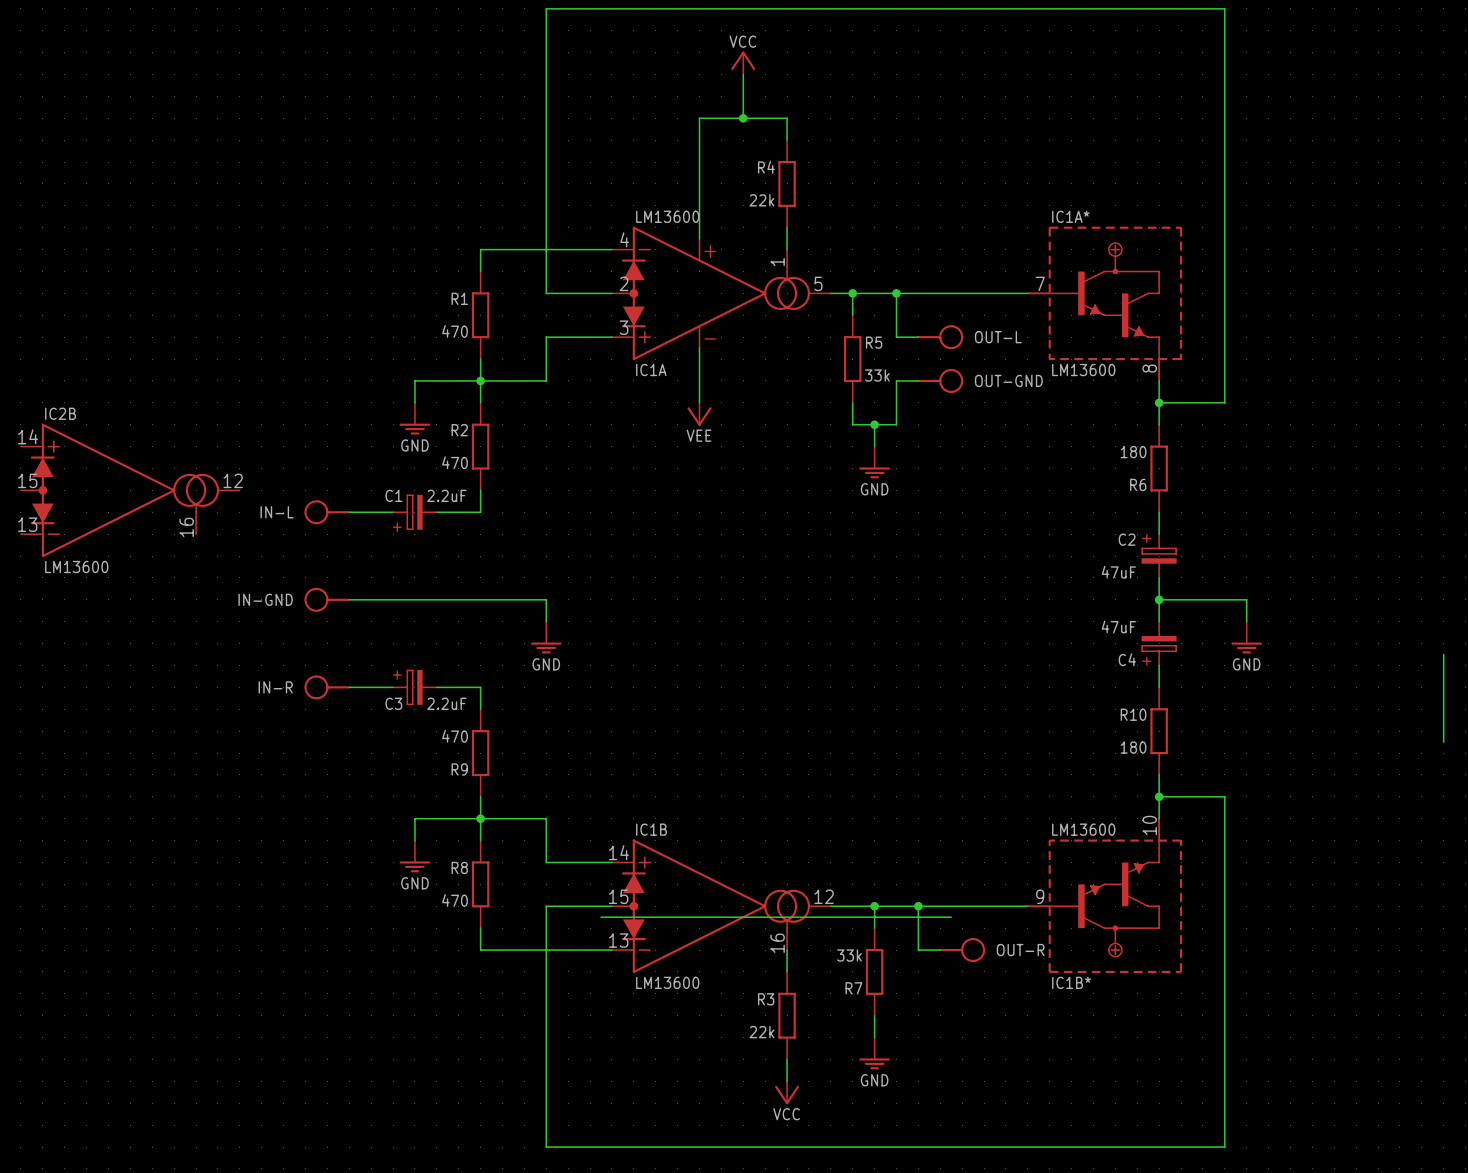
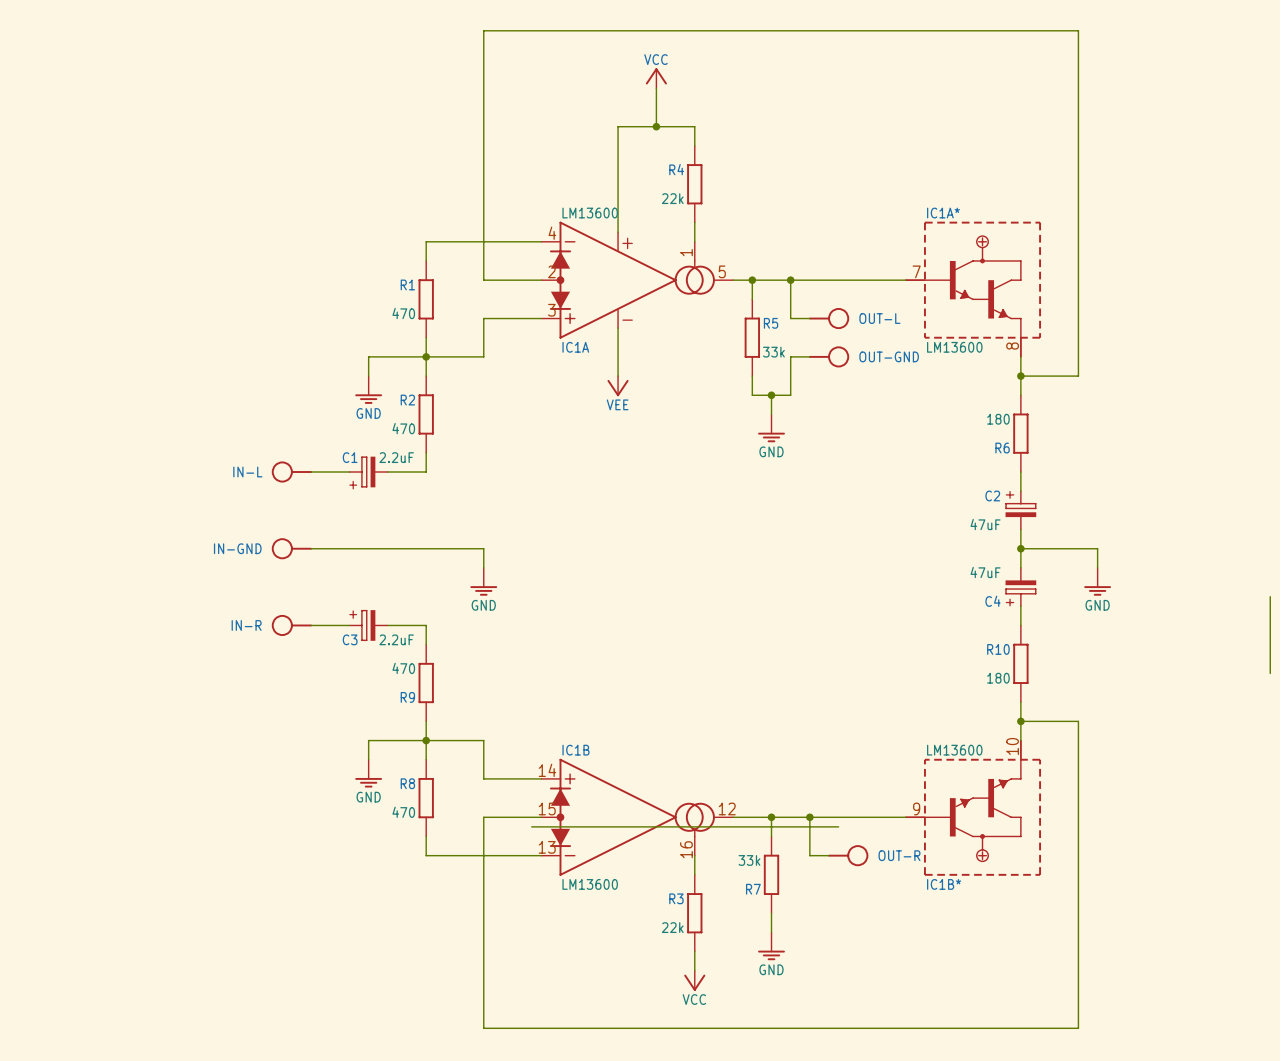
IC2B: LM13600 (130, 490) -> none

